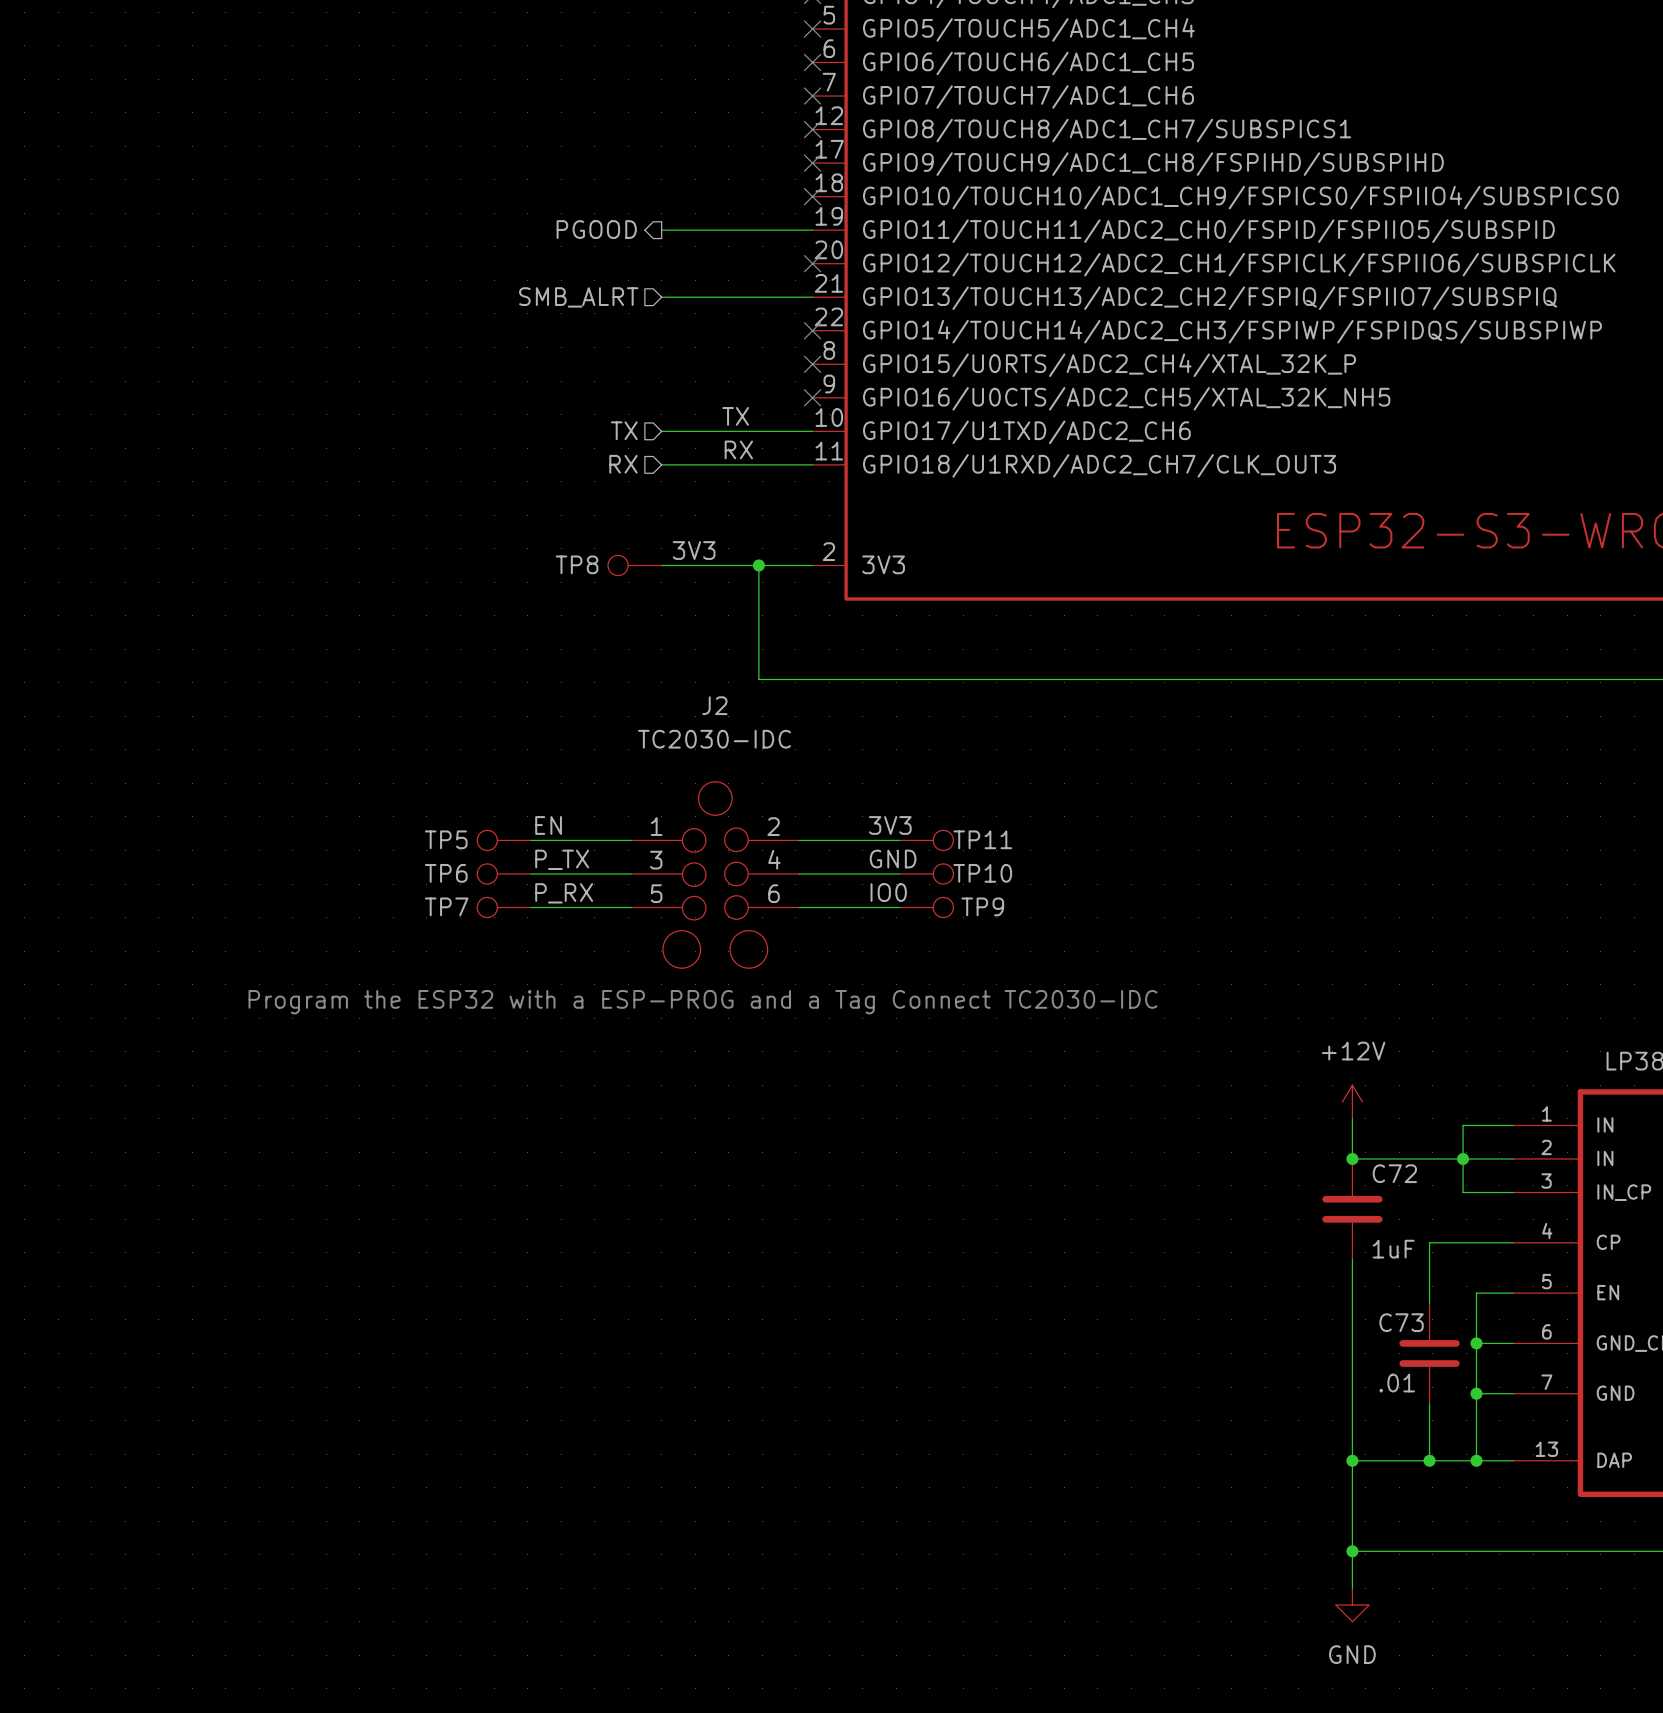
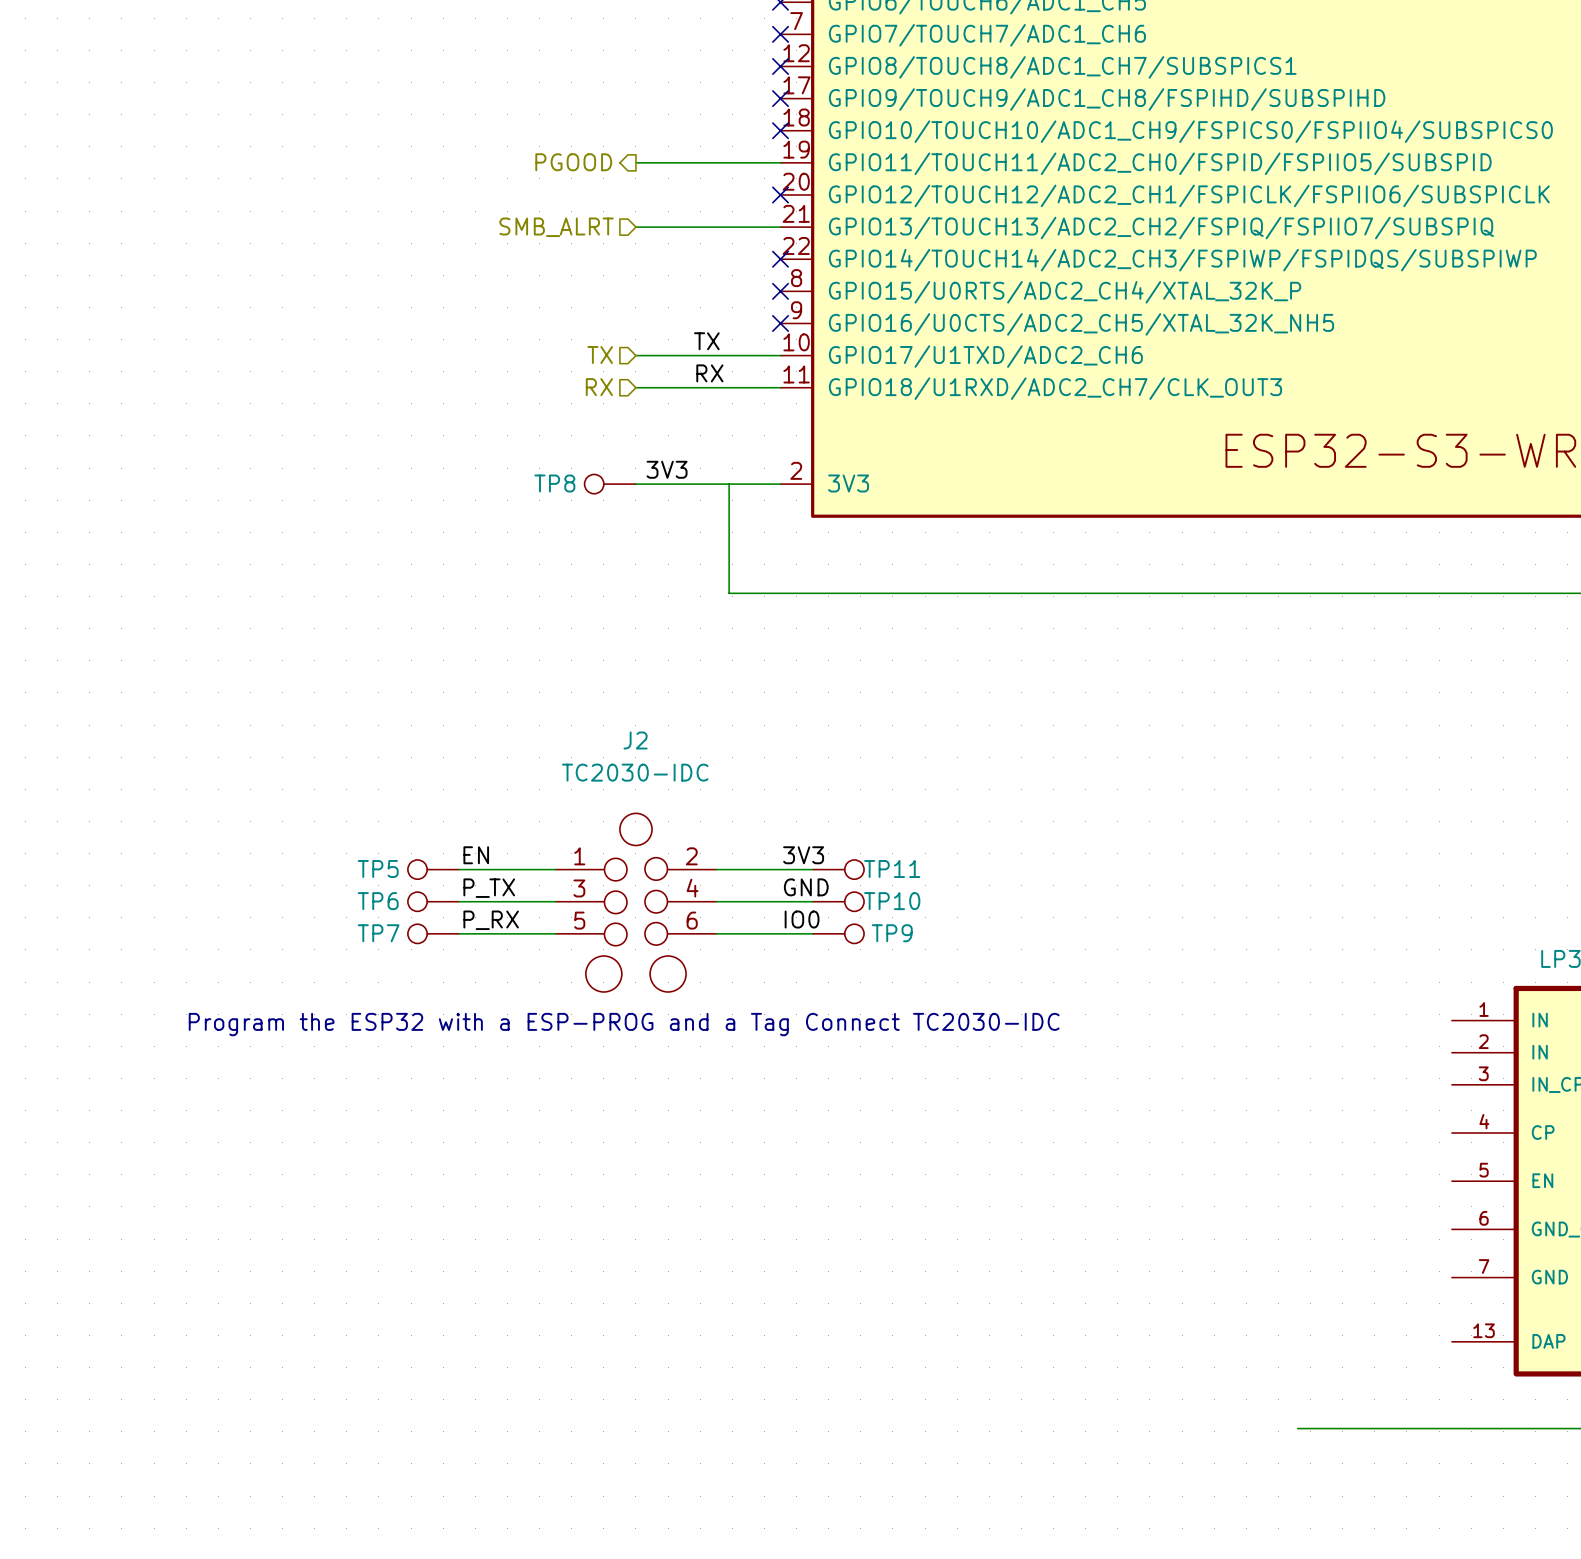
junction: (758, 565) -> none
label position: EN (548, 825) -> EN (476, 855)
label position: 3V3 (890, 825) -> 3V3 (803, 855)
TP5 position: (504, 840) -> (433, 869)
wire: (530, 840) (631, 840) -> (459, 869) (555, 869)
wire: (799, 840) (899, 840) -> (716, 869) (812, 869)
TP11 position: (926, 840) -> (838, 869)
label position: P_TX (562, 859) -> P_TX (489, 888)
label position: GND (893, 859) -> GND (806, 887)
TP6 position: (504, 873) -> (433, 901)
wire: (530, 873) (631, 873) -> (459, 901) (555, 901)
wire: (799, 873) (899, 873) -> (716, 901) (812, 901)
TP10 position: (926, 873) -> (838, 901)
J2 position: (715, 874) -> (635, 902)
label position: IO0 (888, 892) -> IO0 (802, 919)
label position: P_RX (564, 893) -> P_RX (491, 920)
TP7 position: (504, 907) -> (433, 933)
wire: (530, 907) (631, 907) -> (459, 933) (555, 933)
wire: (799, 907) (899, 907) -> (716, 933) (812, 933)
TP9 position: (926, 907) -> (838, 933)
text position: Program the ESP32 with a ESP-PROG and a Tag Connect TC2030-IDC (702, 1002) -> Program the ESP32 with a ESP-PROG and a Tag Connect TC2030-IDC (624, 1024)
power symbol: +12V (1352, 1101) -> none
wire: (1352, 1118) (1352, 1158) (1513, 1158) -> none
wire: (1513, 1125) (1463, 1125) (1463, 1192) (1513, 1192) -> none
junction: (1352, 1158) -> none
junction: (1463, 1158) -> none
C72: 1uF (1352, 1209) -> none
wire: (1513, 1242) (1429, 1242) (1429, 1303) -> none
wire: (1352, 1259) (1352, 1588) -> none
wire: (1513, 1293) (1476, 1293) (1476, 1460) -> none
wire: (1476, 1343) (1513, 1343) -> none
junction: (1476, 1343) -> none
C73: .01 (1429, 1353) -> none
wire: (1476, 1393) (1513, 1393) -> none
junction: (1476, 1393) -> none
wire: (1429, 1403) (1429, 1460) -> none
wire: (1352, 1460) (1513, 1460) -> none
junction: (1352, 1460) -> none
junction: (1429, 1460) -> none
junction: (1476, 1460) -> none
junction: (1352, 1551) -> none
power symbol: GND (1352, 1604) -> none

